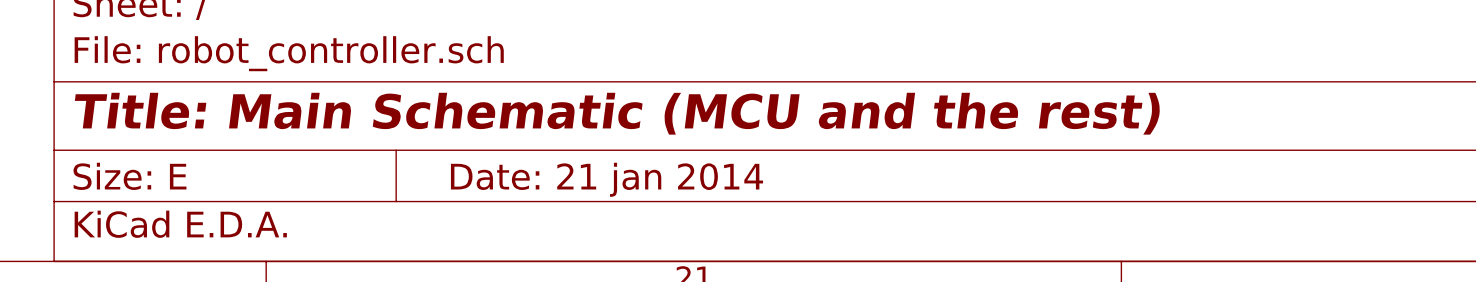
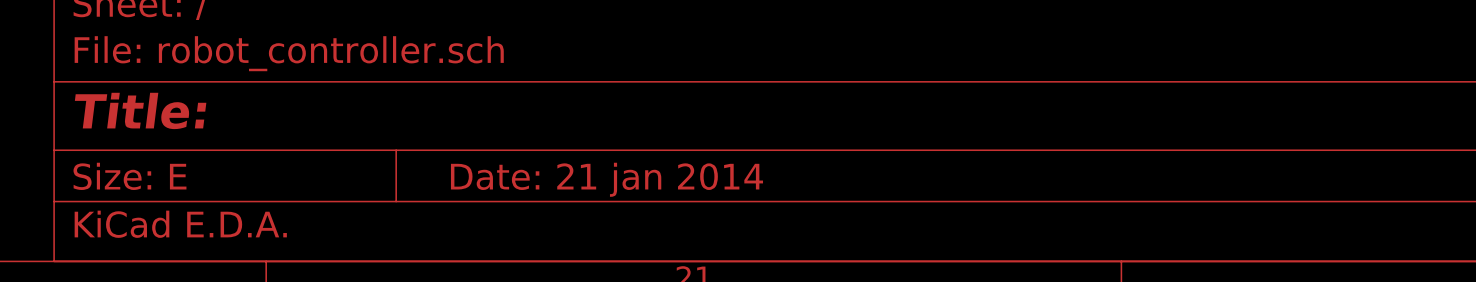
title block: Title: Main Schematic (MCU and the rest) (617, 113) -> Title: (140, 110)

